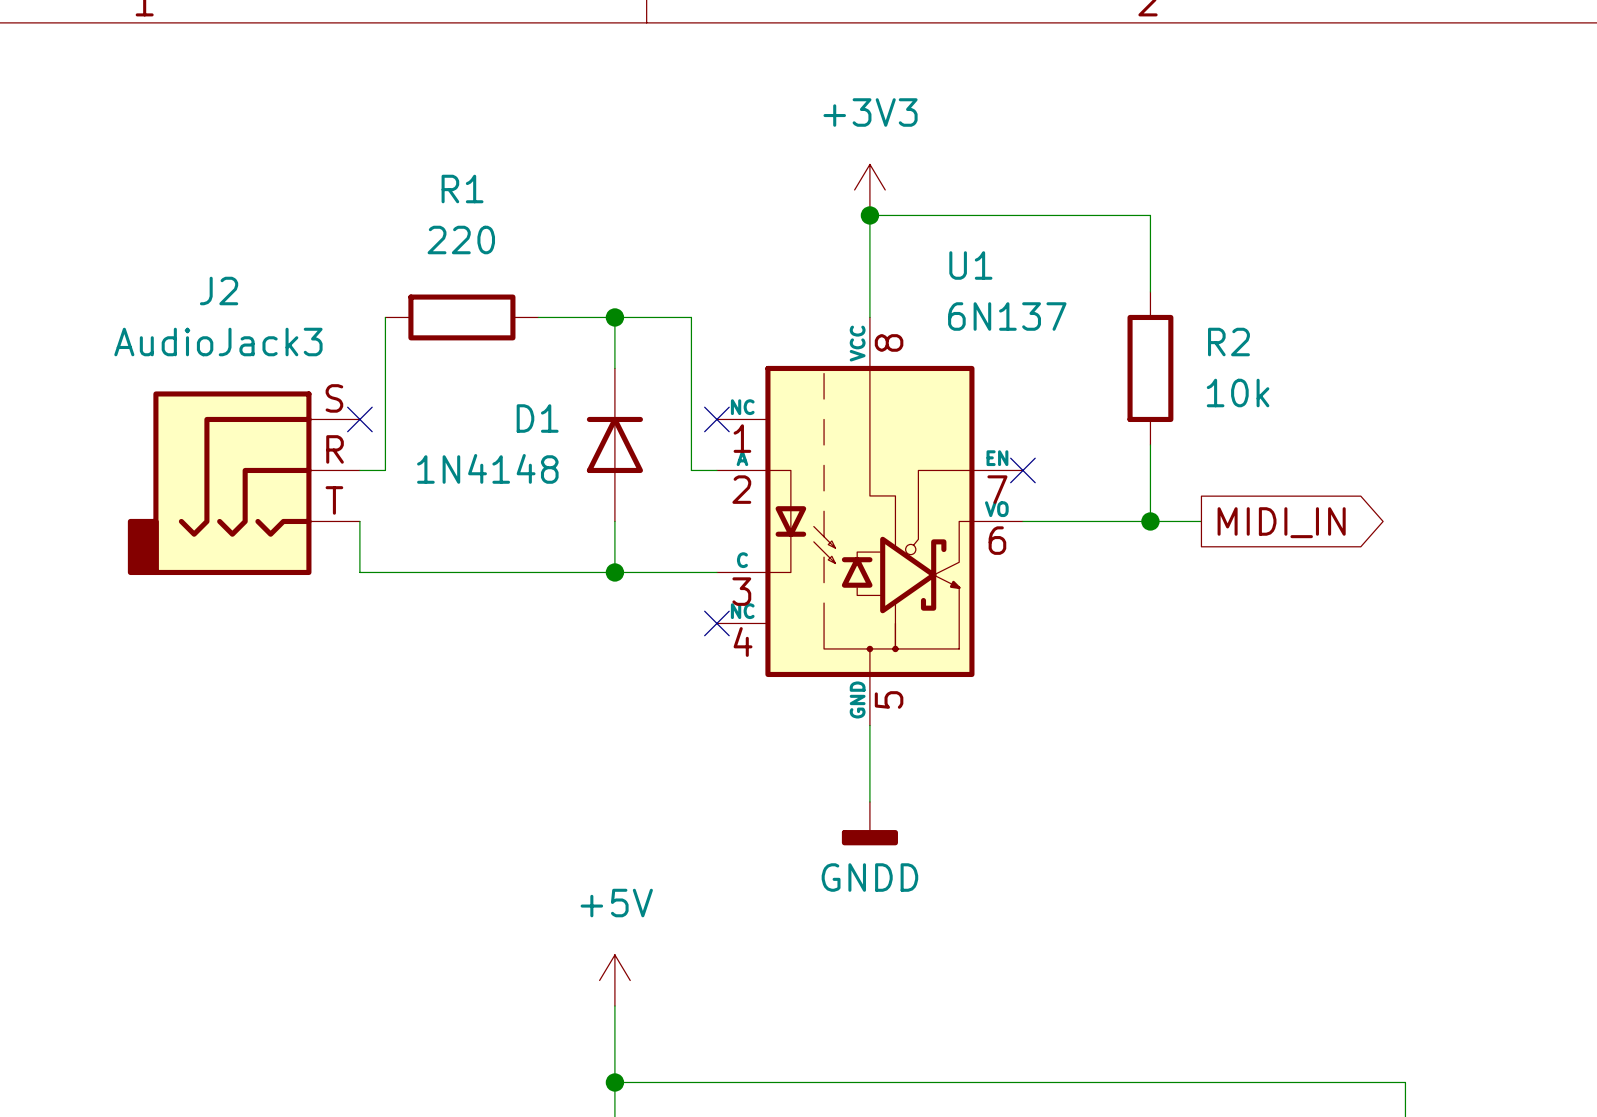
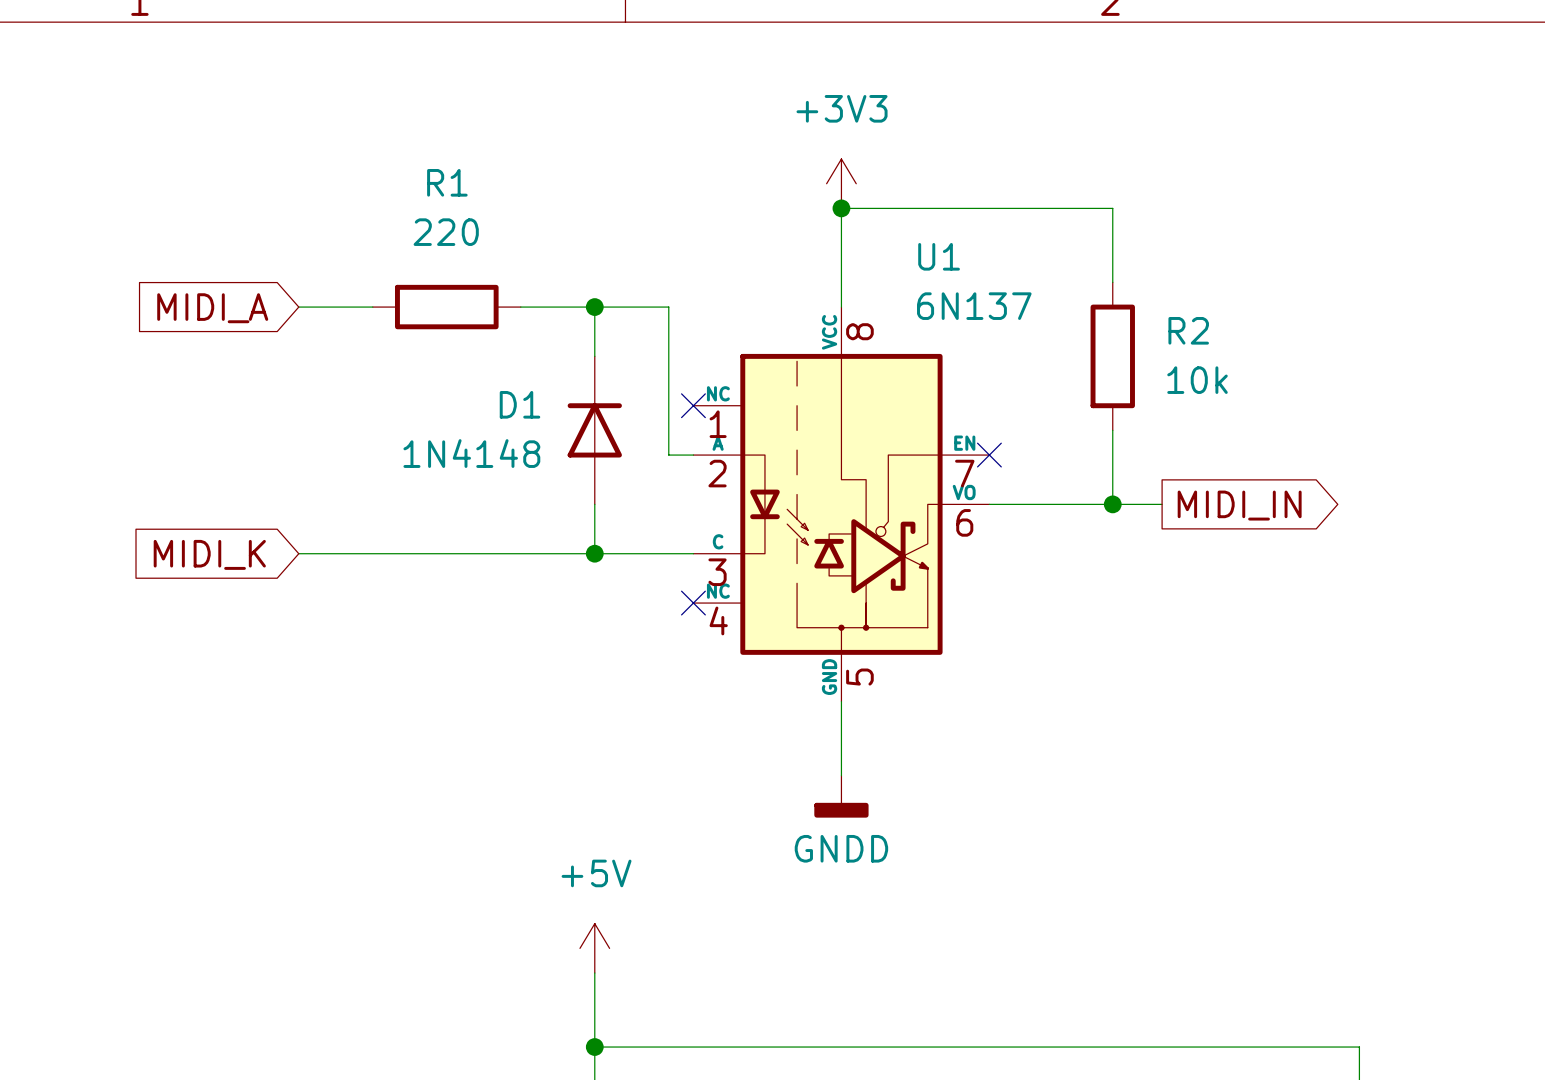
wire: (385, 317) (385, 470) (359, 470) -> (372, 307) (298, 307)
global label: none -> MIDI_A (212, 308)
no-connect mark: (359, 419) -> none
J2: AudioJack3 (243, 483) -> none
wire: (359, 521) (359, 572) -> (298, 553) (348, 553)
global label: none -> MIDI_K (209, 554)

